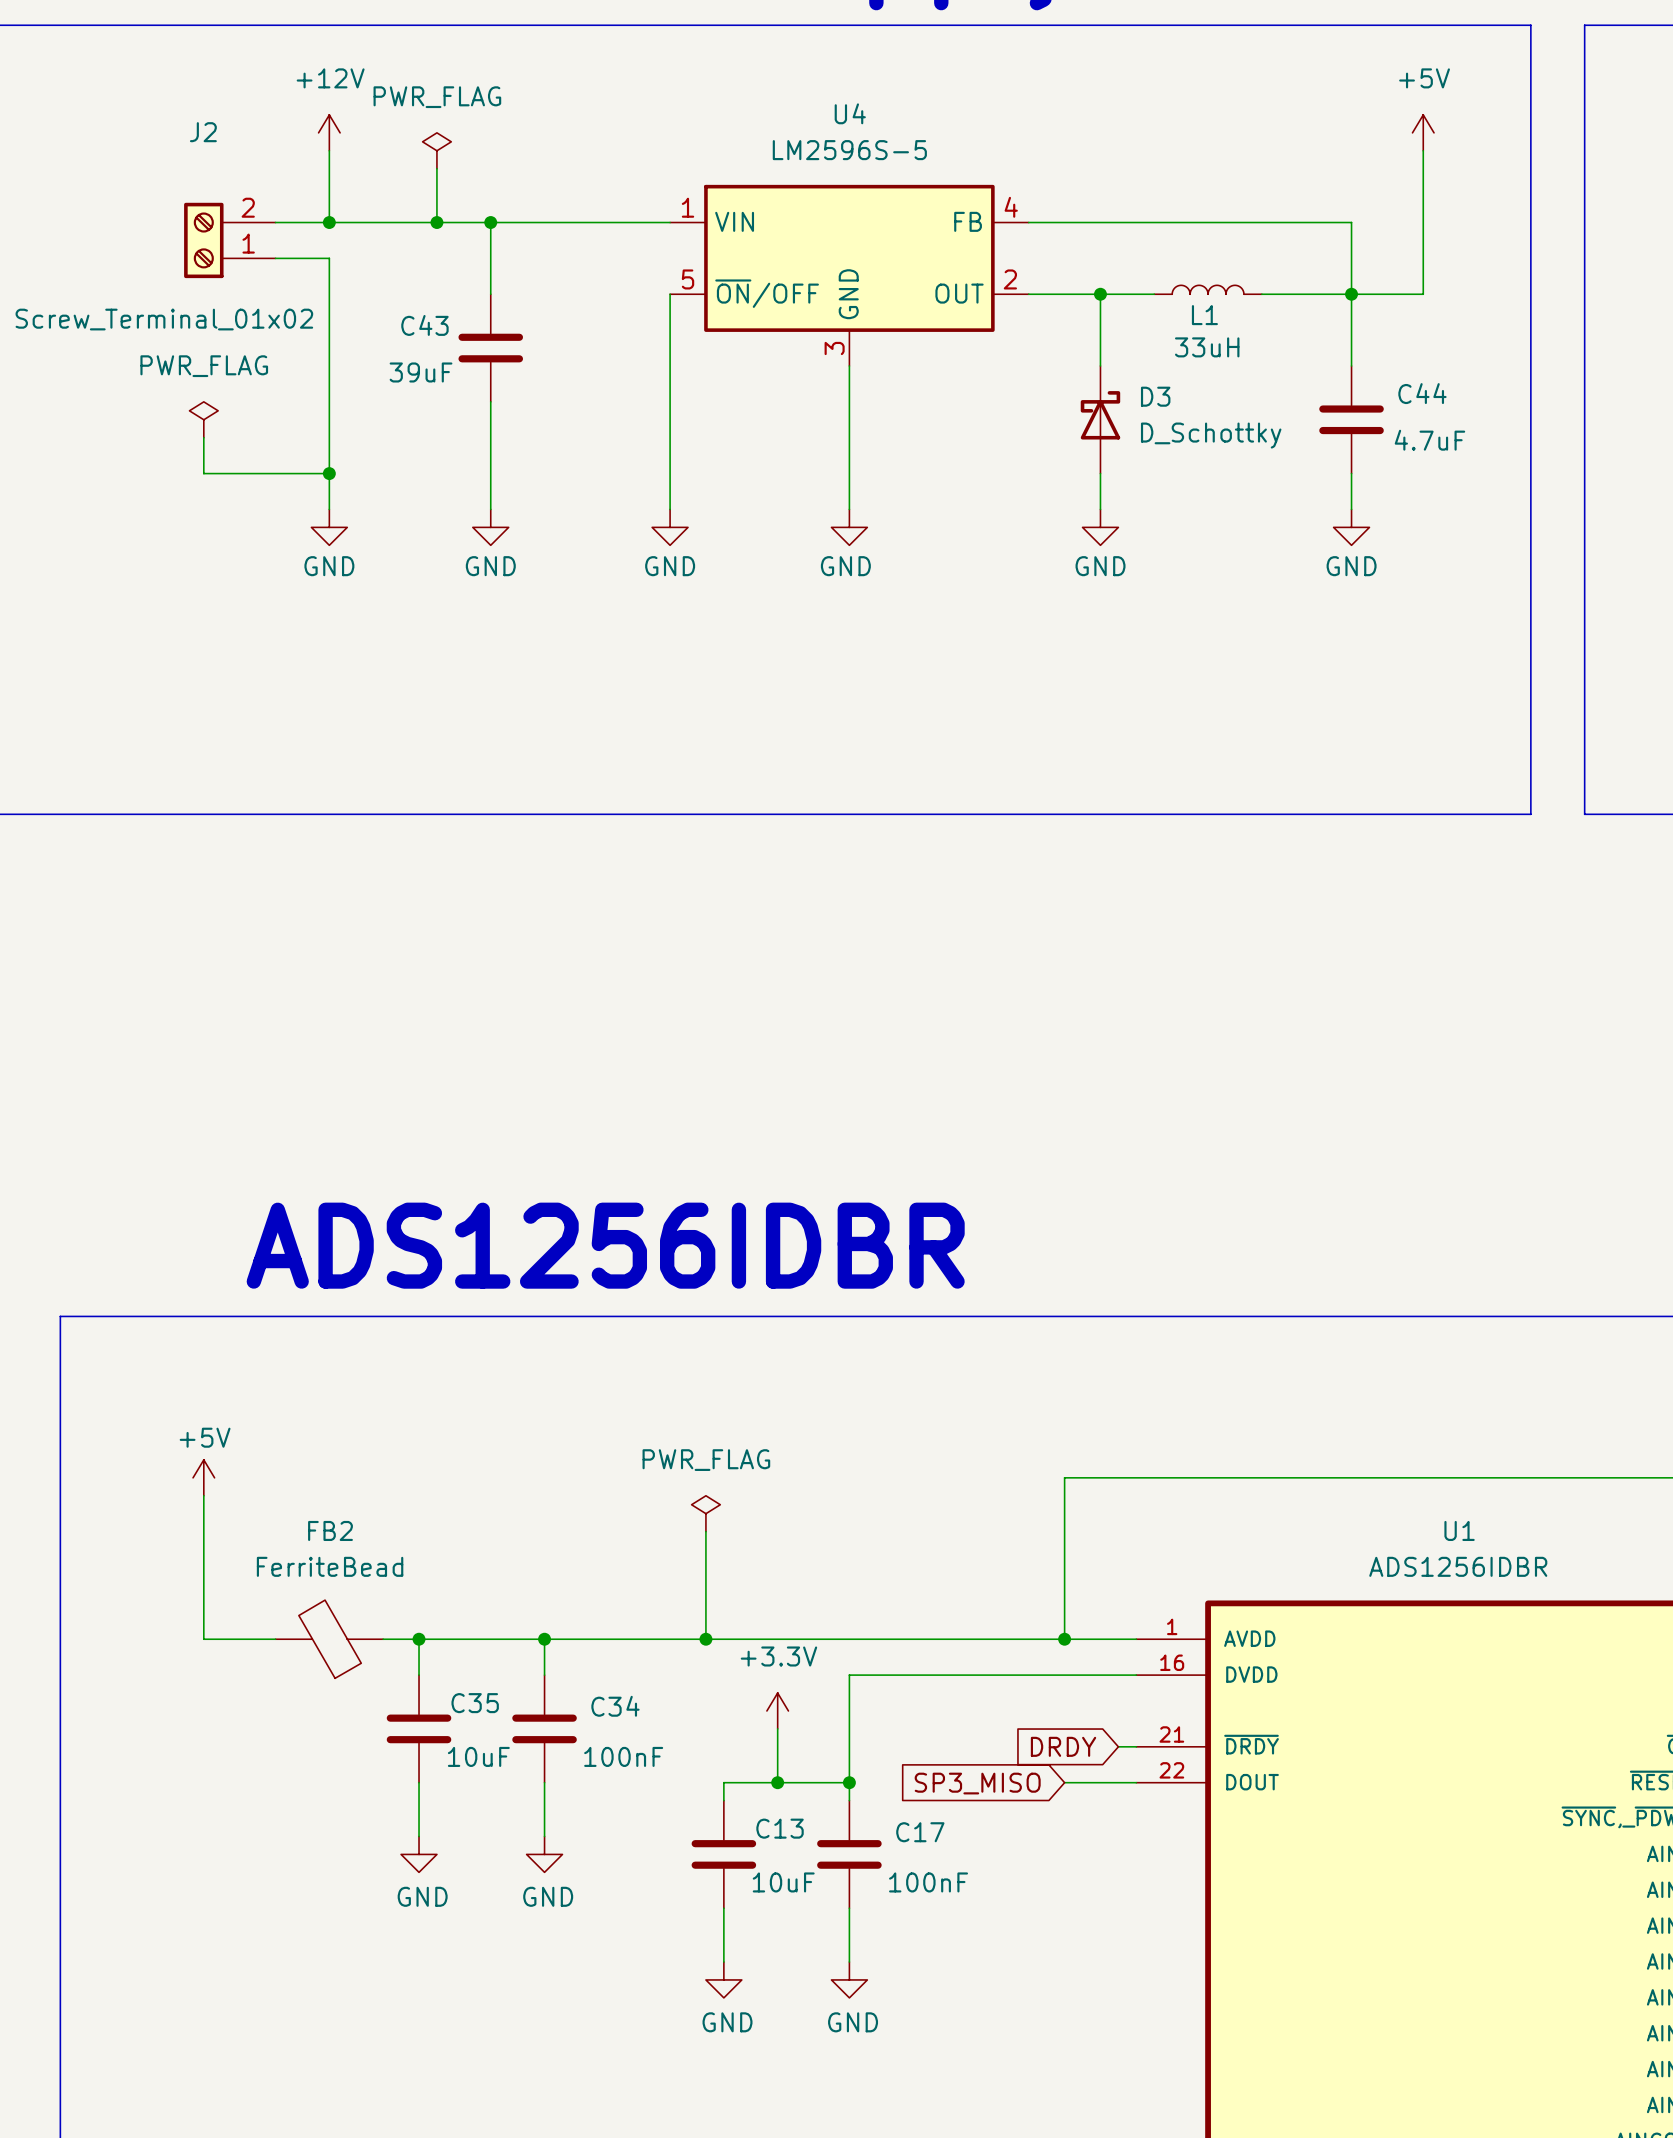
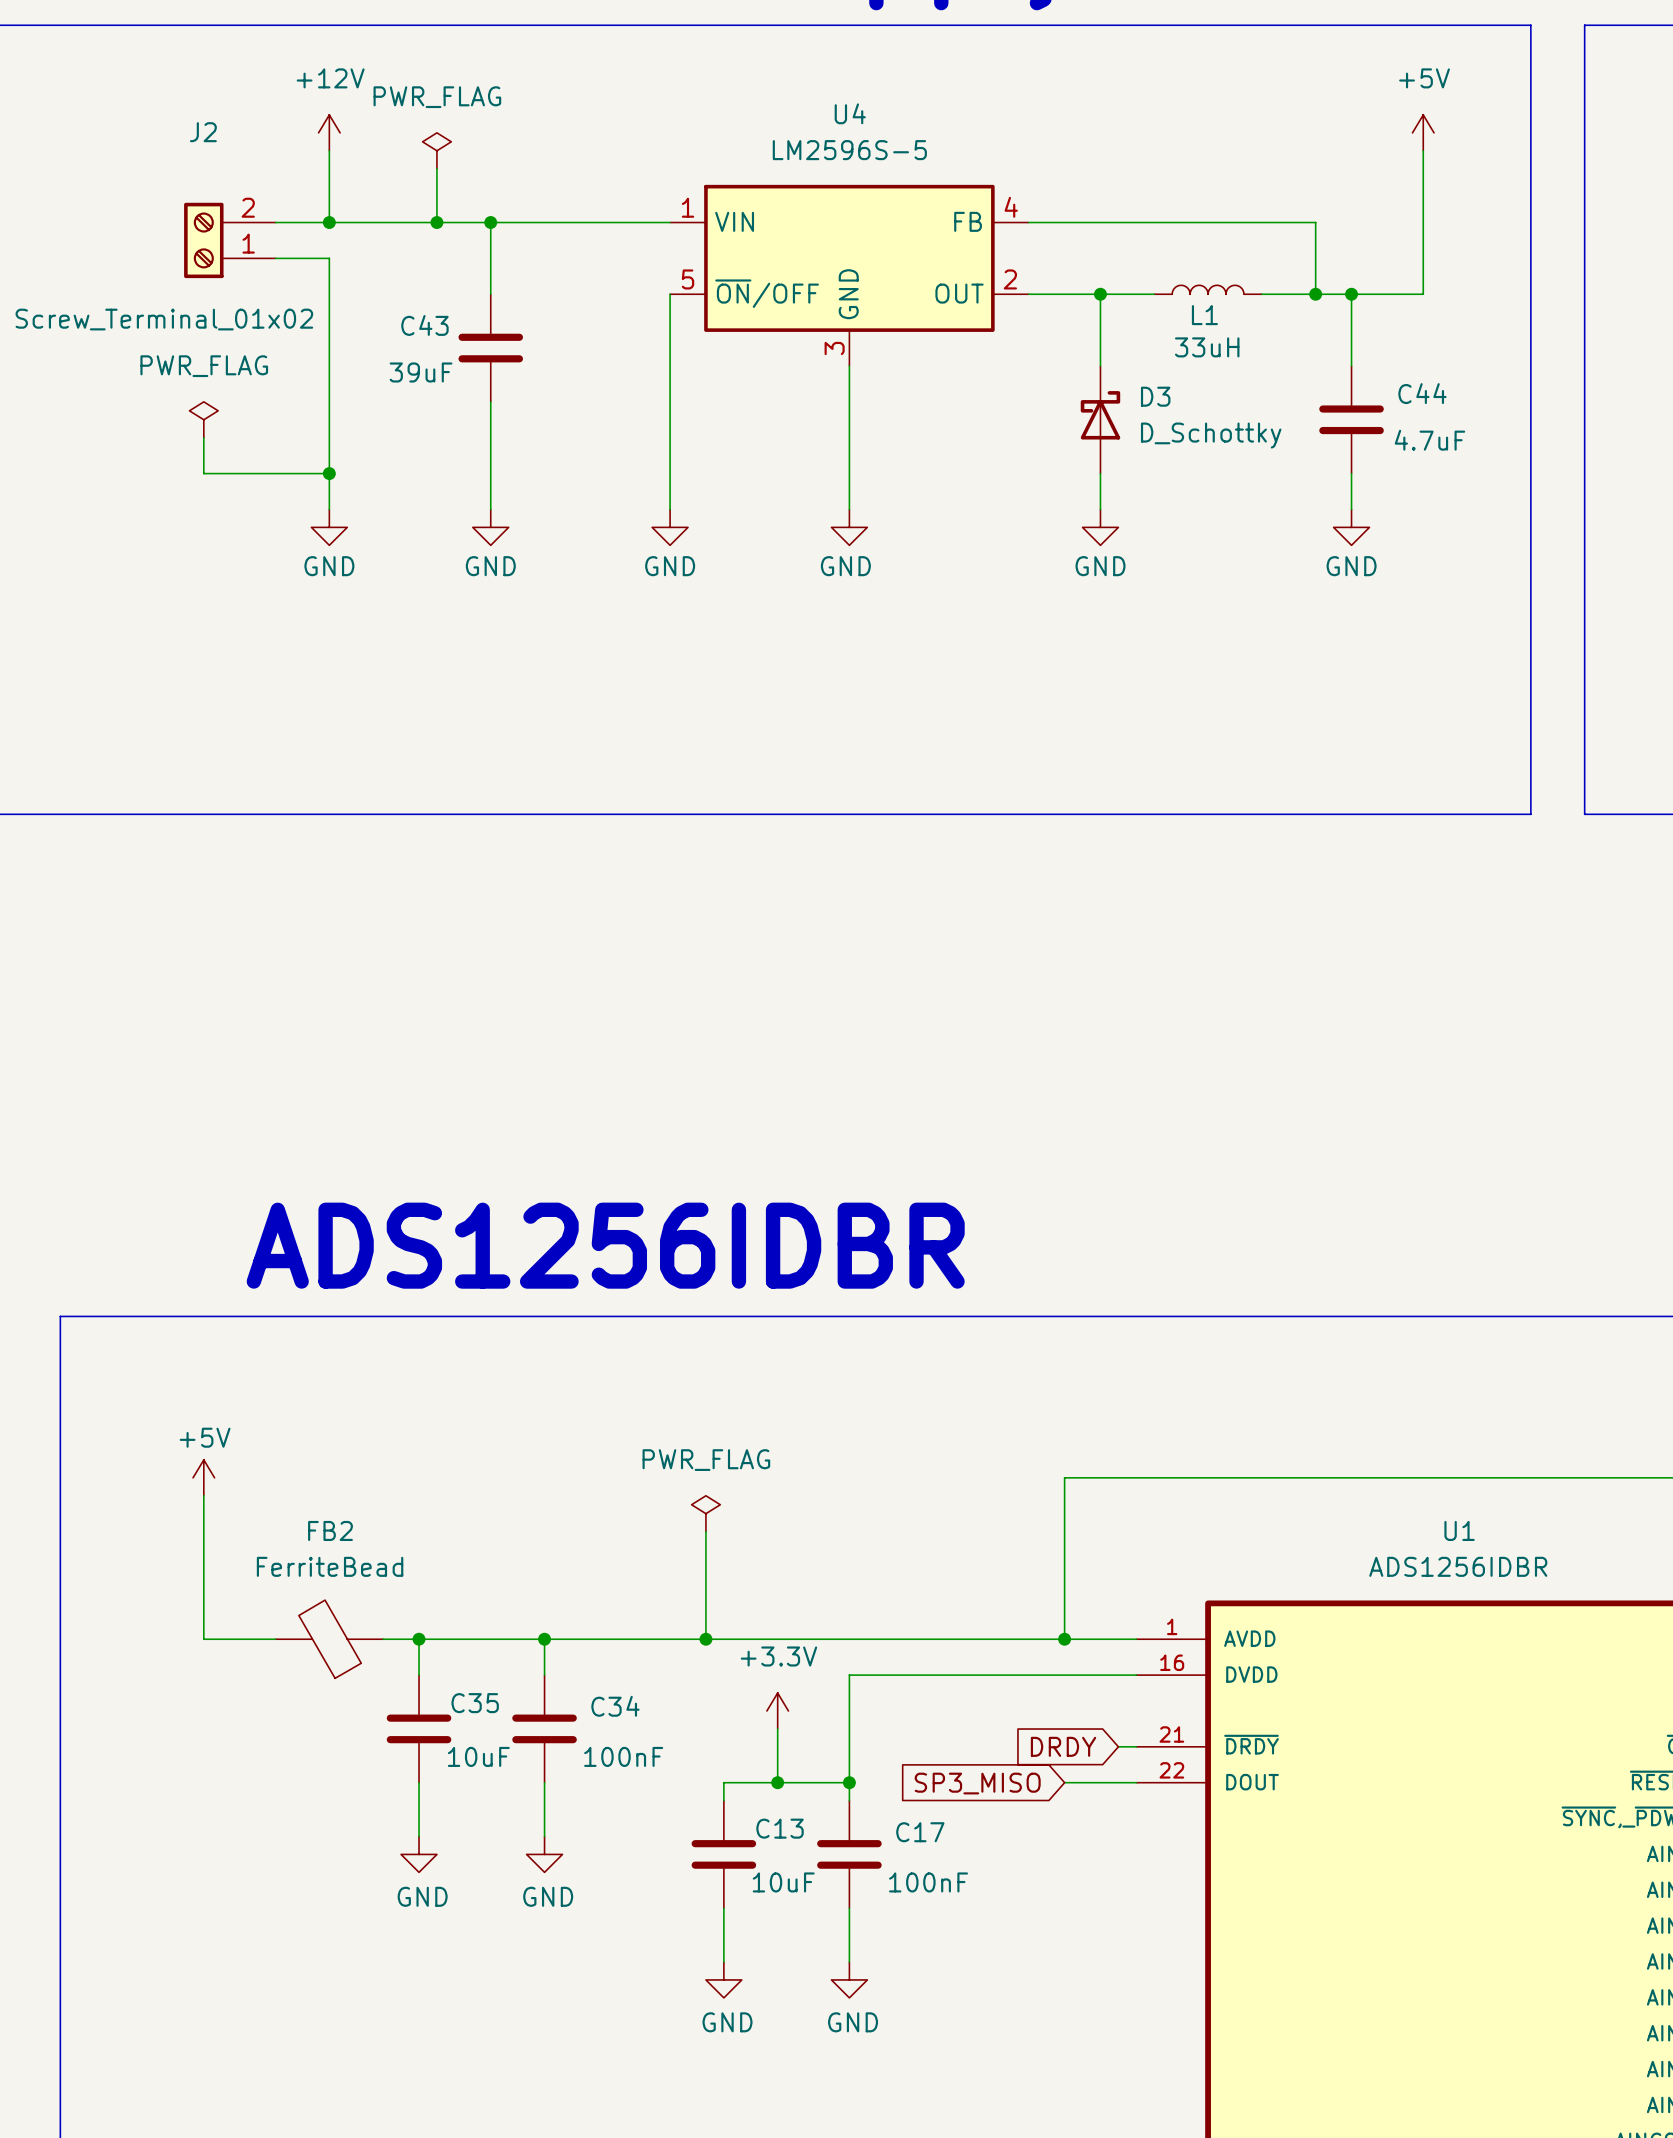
wire: (1315, 222) (1351, 222) (1351, 294) -> (1315, 222) (1315, 294)
junction: none -> (1315, 294)

